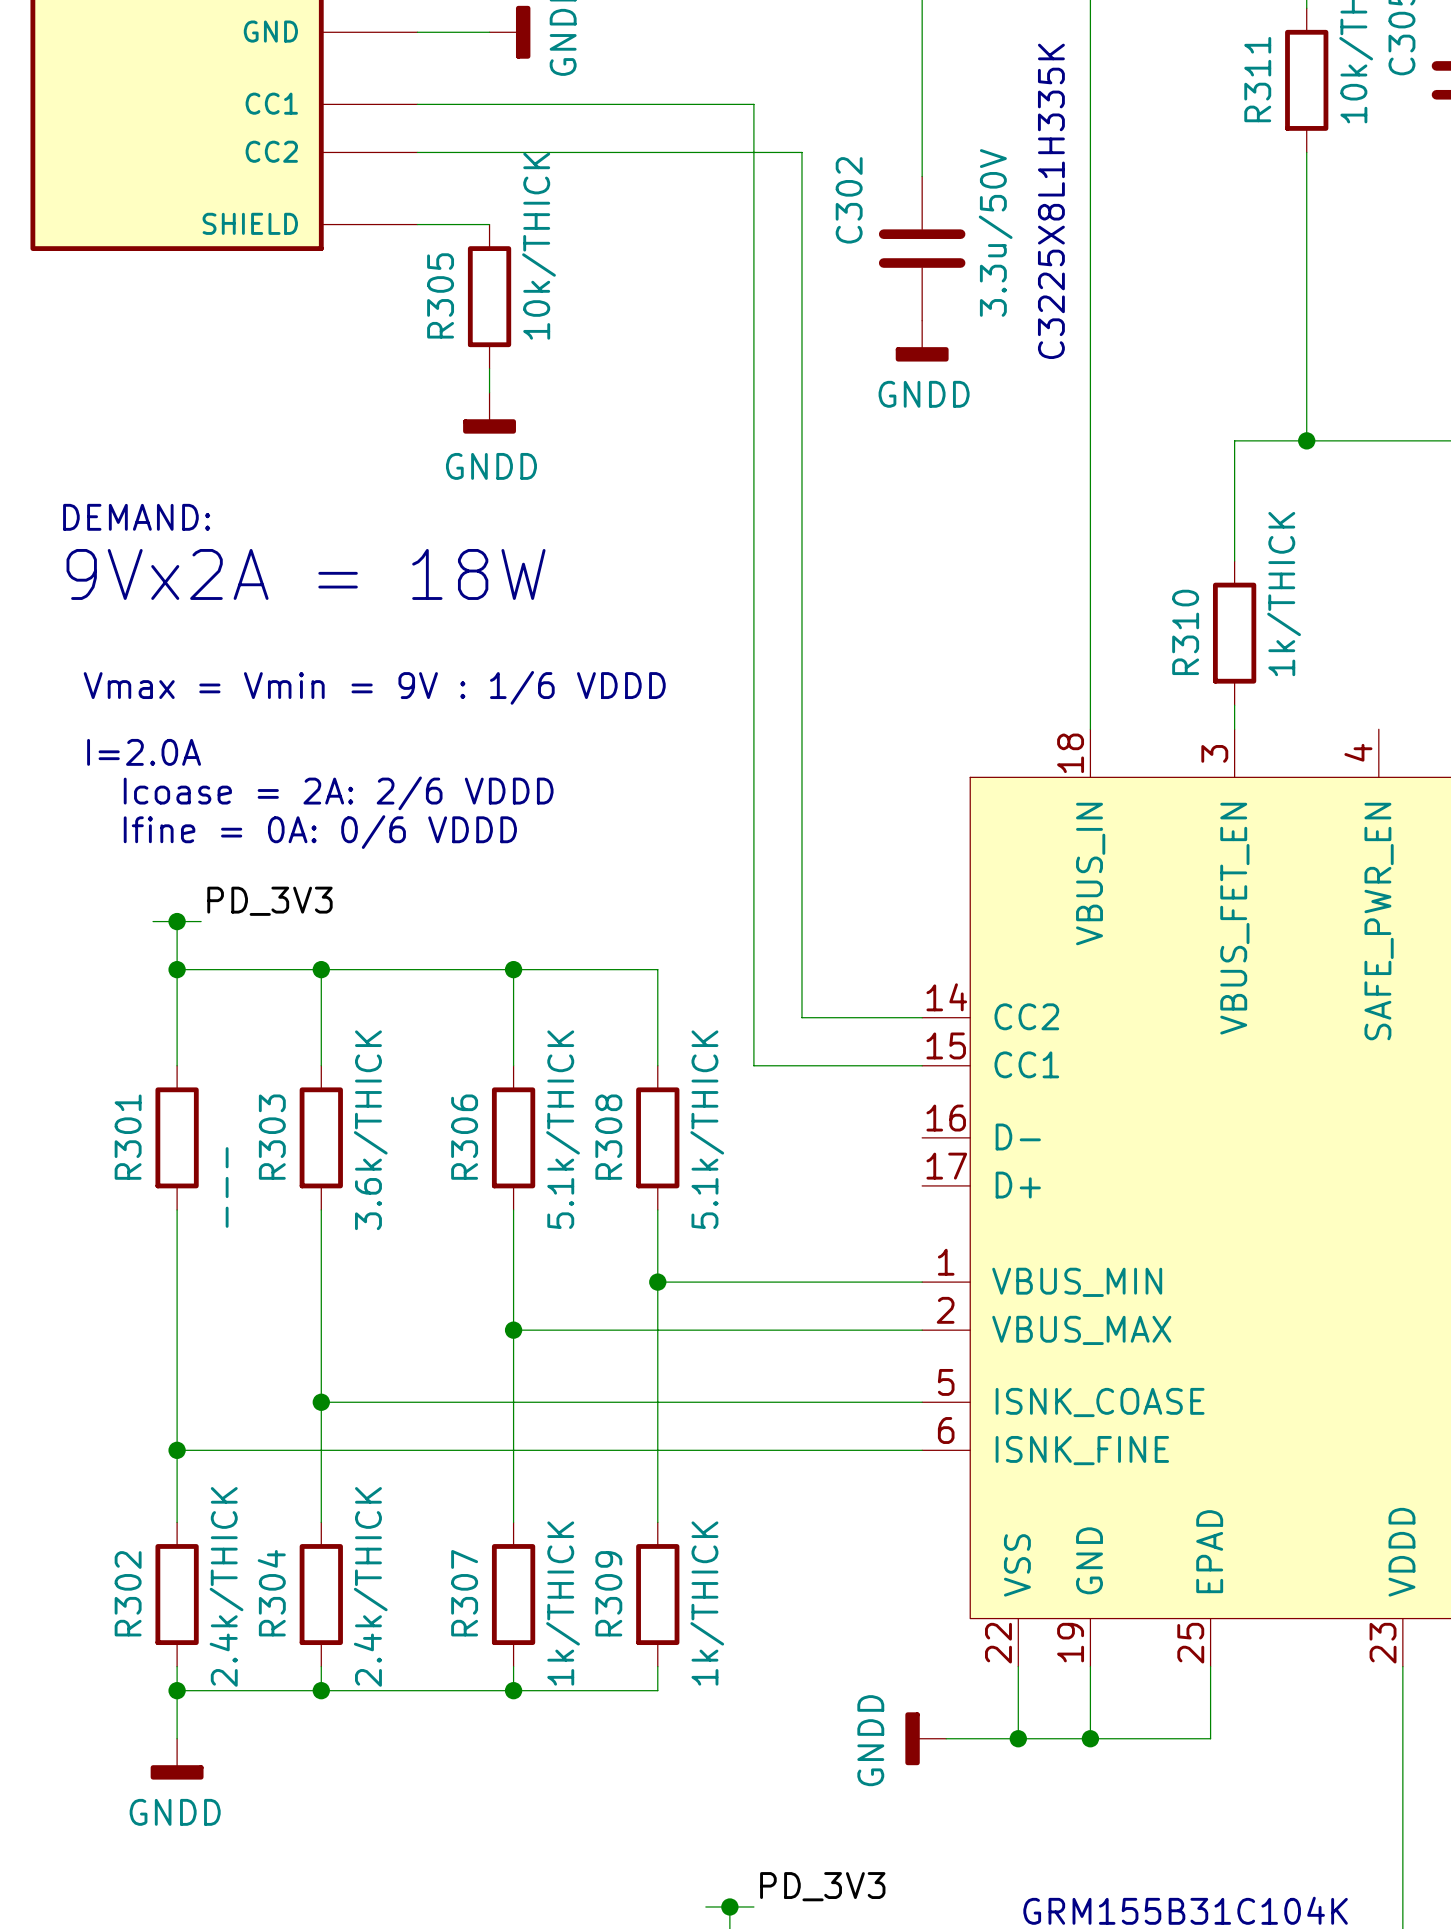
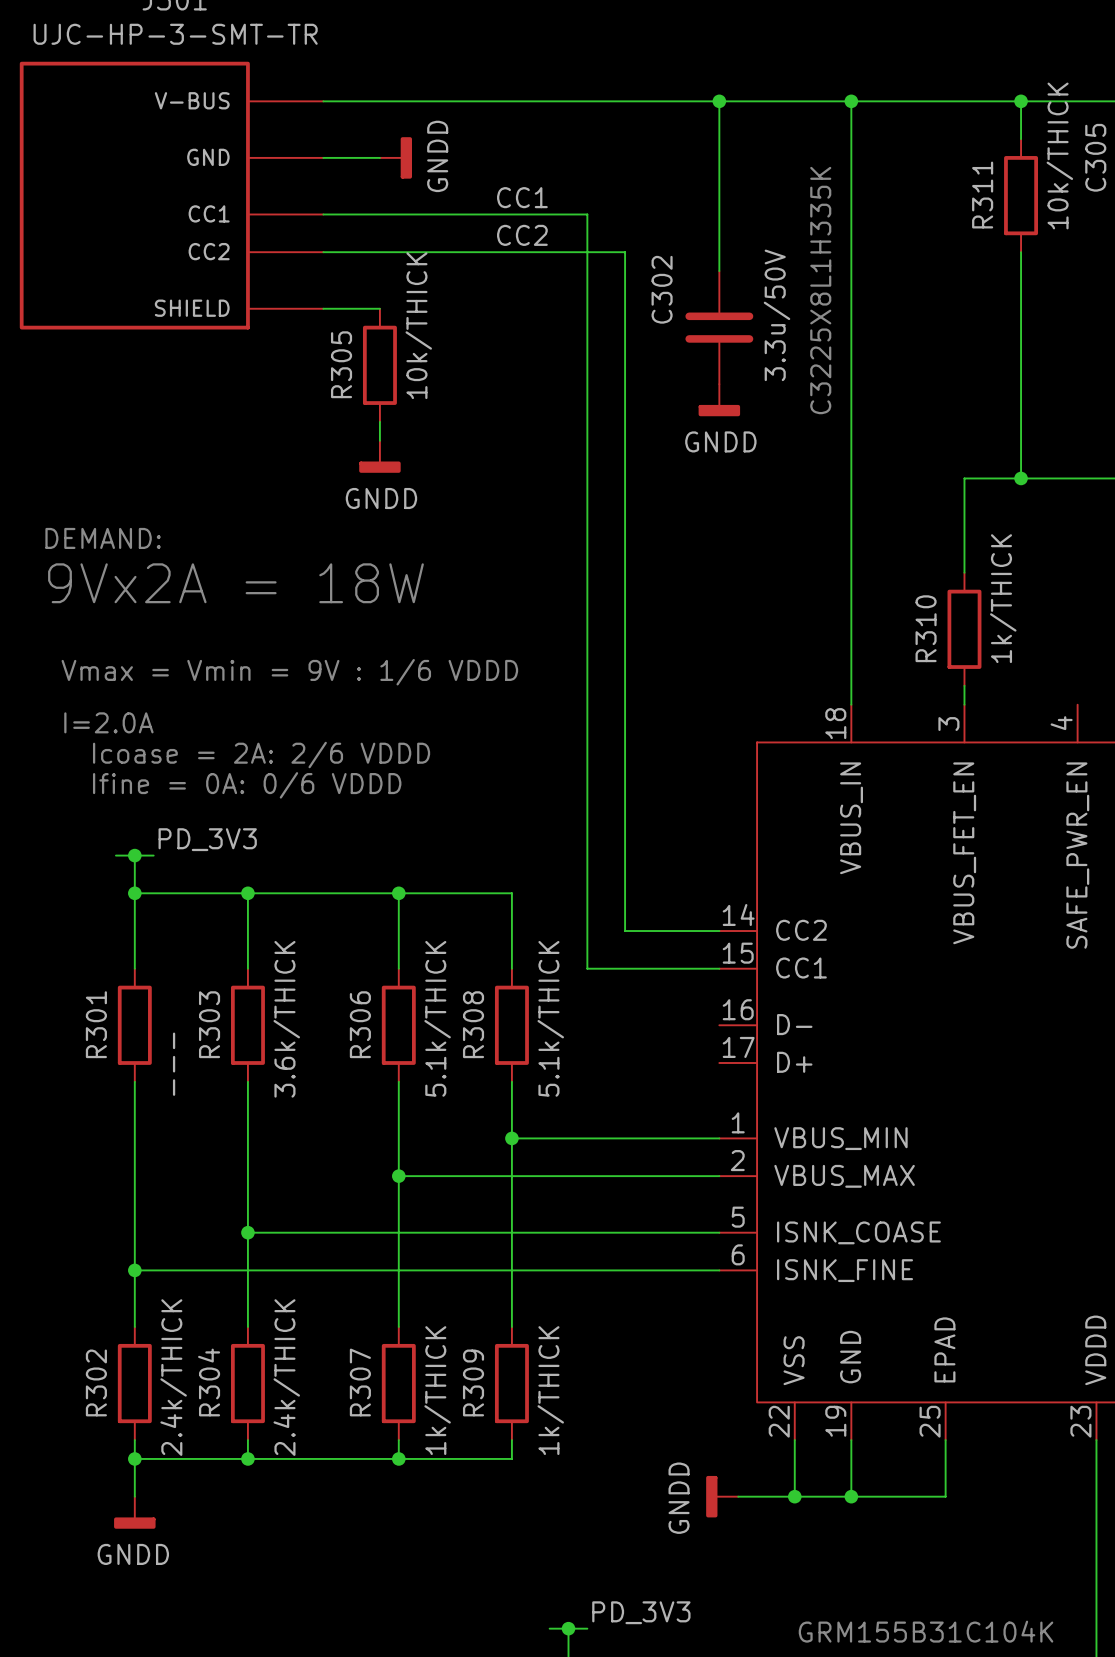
label: none -> CC1 (522, 197)
label: none -> CC2 (522, 235)

